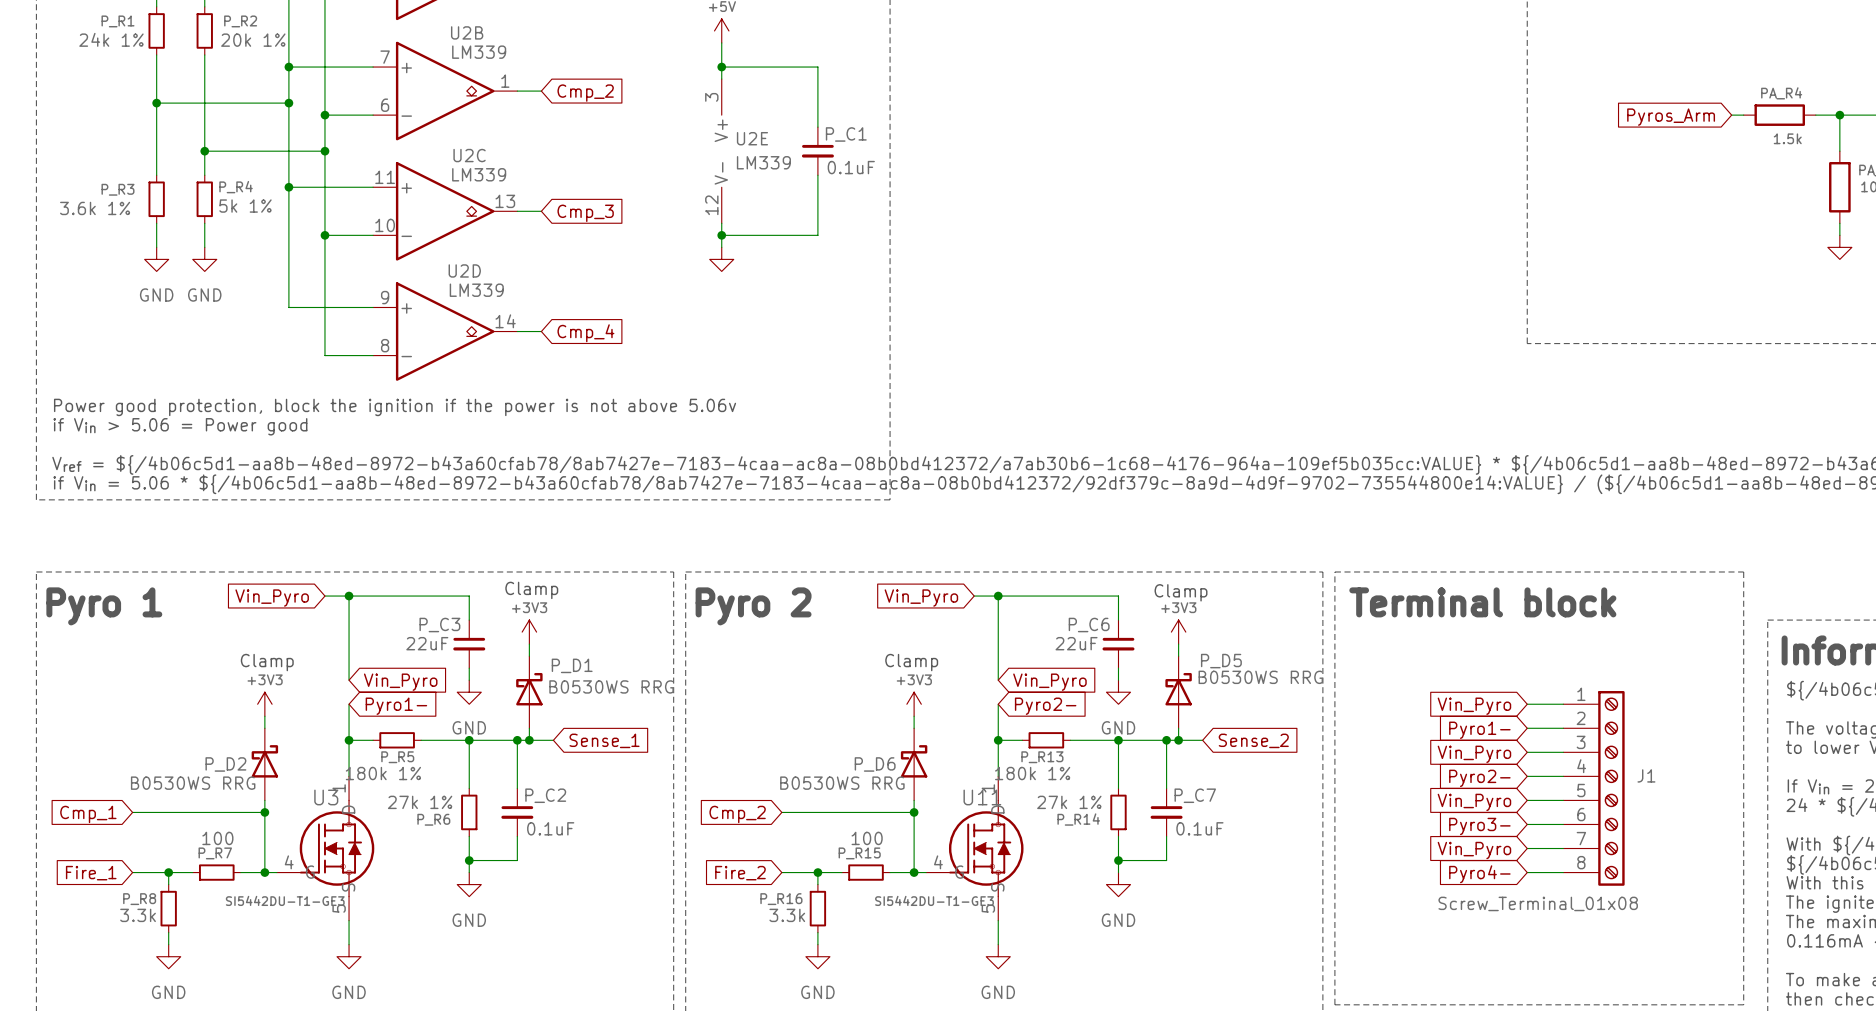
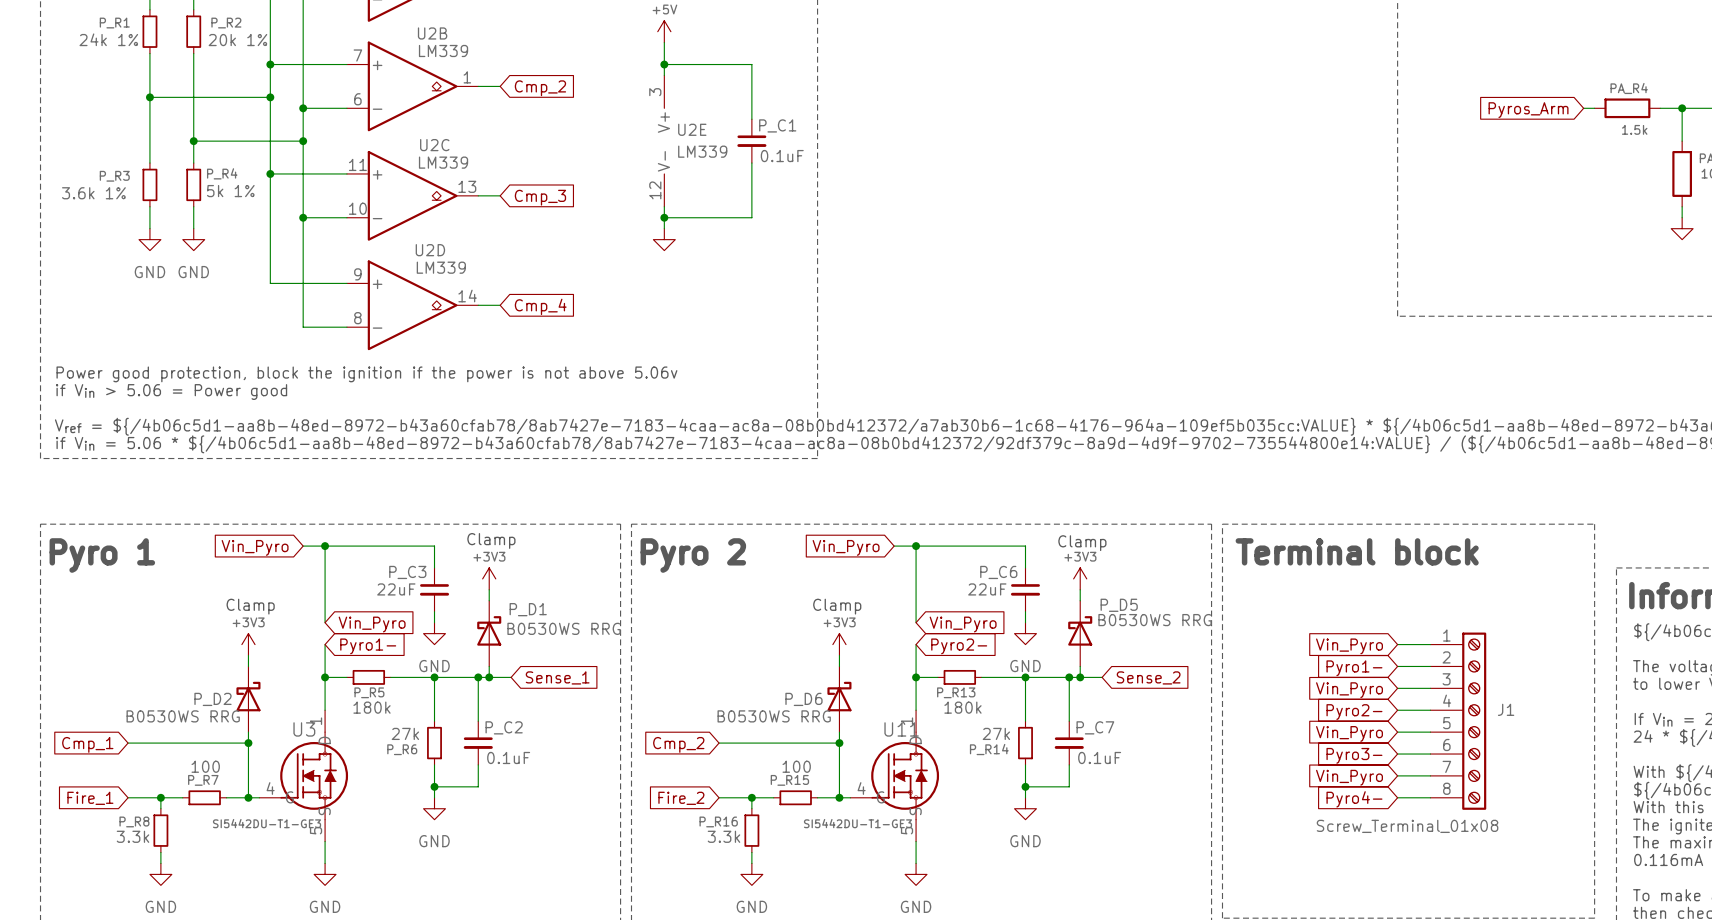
P_R5 value: 180k 1% (383, 773) -> 180k (371, 707)
P_R13 value: 180k 1% (1032, 773) -> 180k (962, 707)
P_R6 value: 27k 1% (420, 802) -> 27k (405, 733)
P_R14 value: 27k 1% (1069, 802) -> 27k (996, 733)

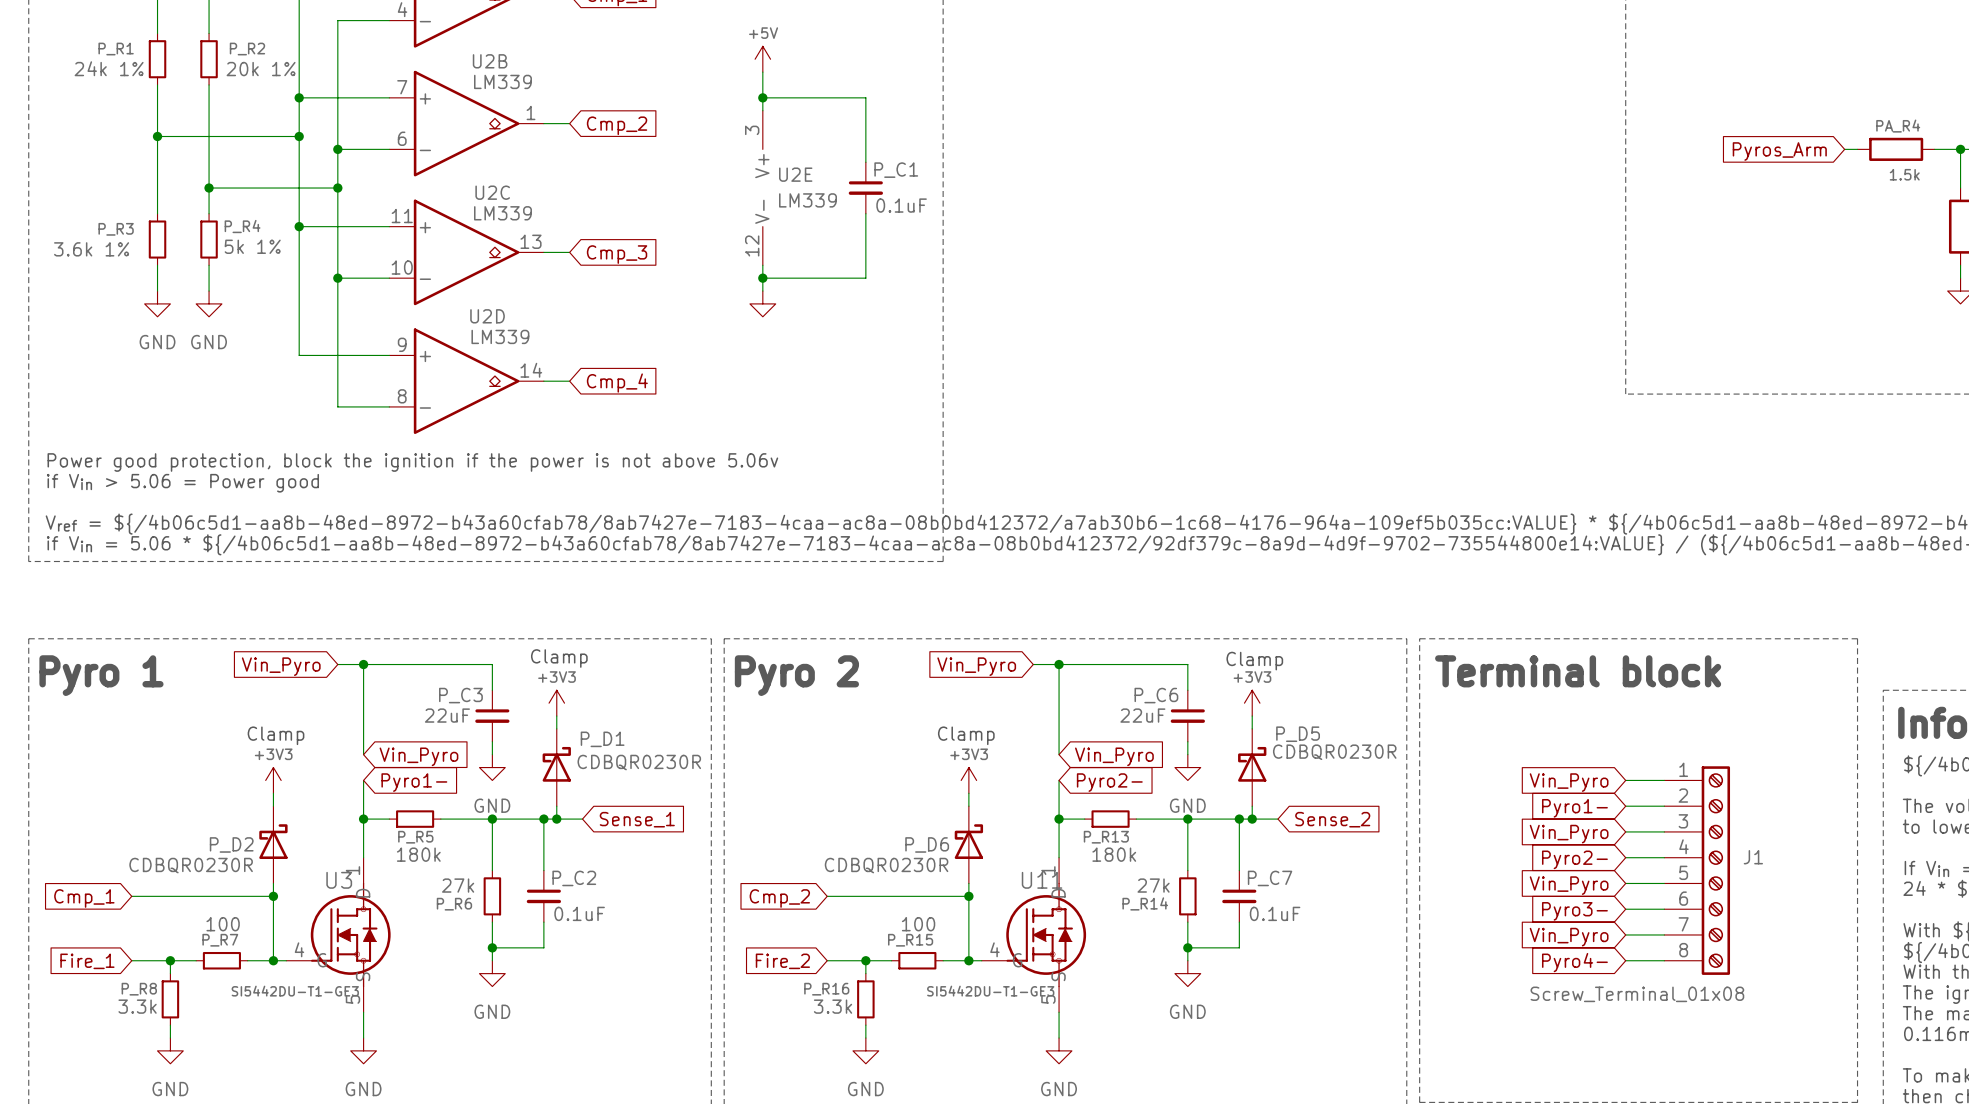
P_D5 value: B0530WS RRG (1155, 620) -> CDBQR0230R (1334, 752)
P_D1 value: B0530WS RRG (564, 628) -> CDBQR0230R (639, 762)
P_D2 value: B0530WS RRG (183, 716) -> CDBQR0230R (191, 865)
P_D6 value: B0530WS RRG (774, 716) -> CDBQR0230R (886, 865)

